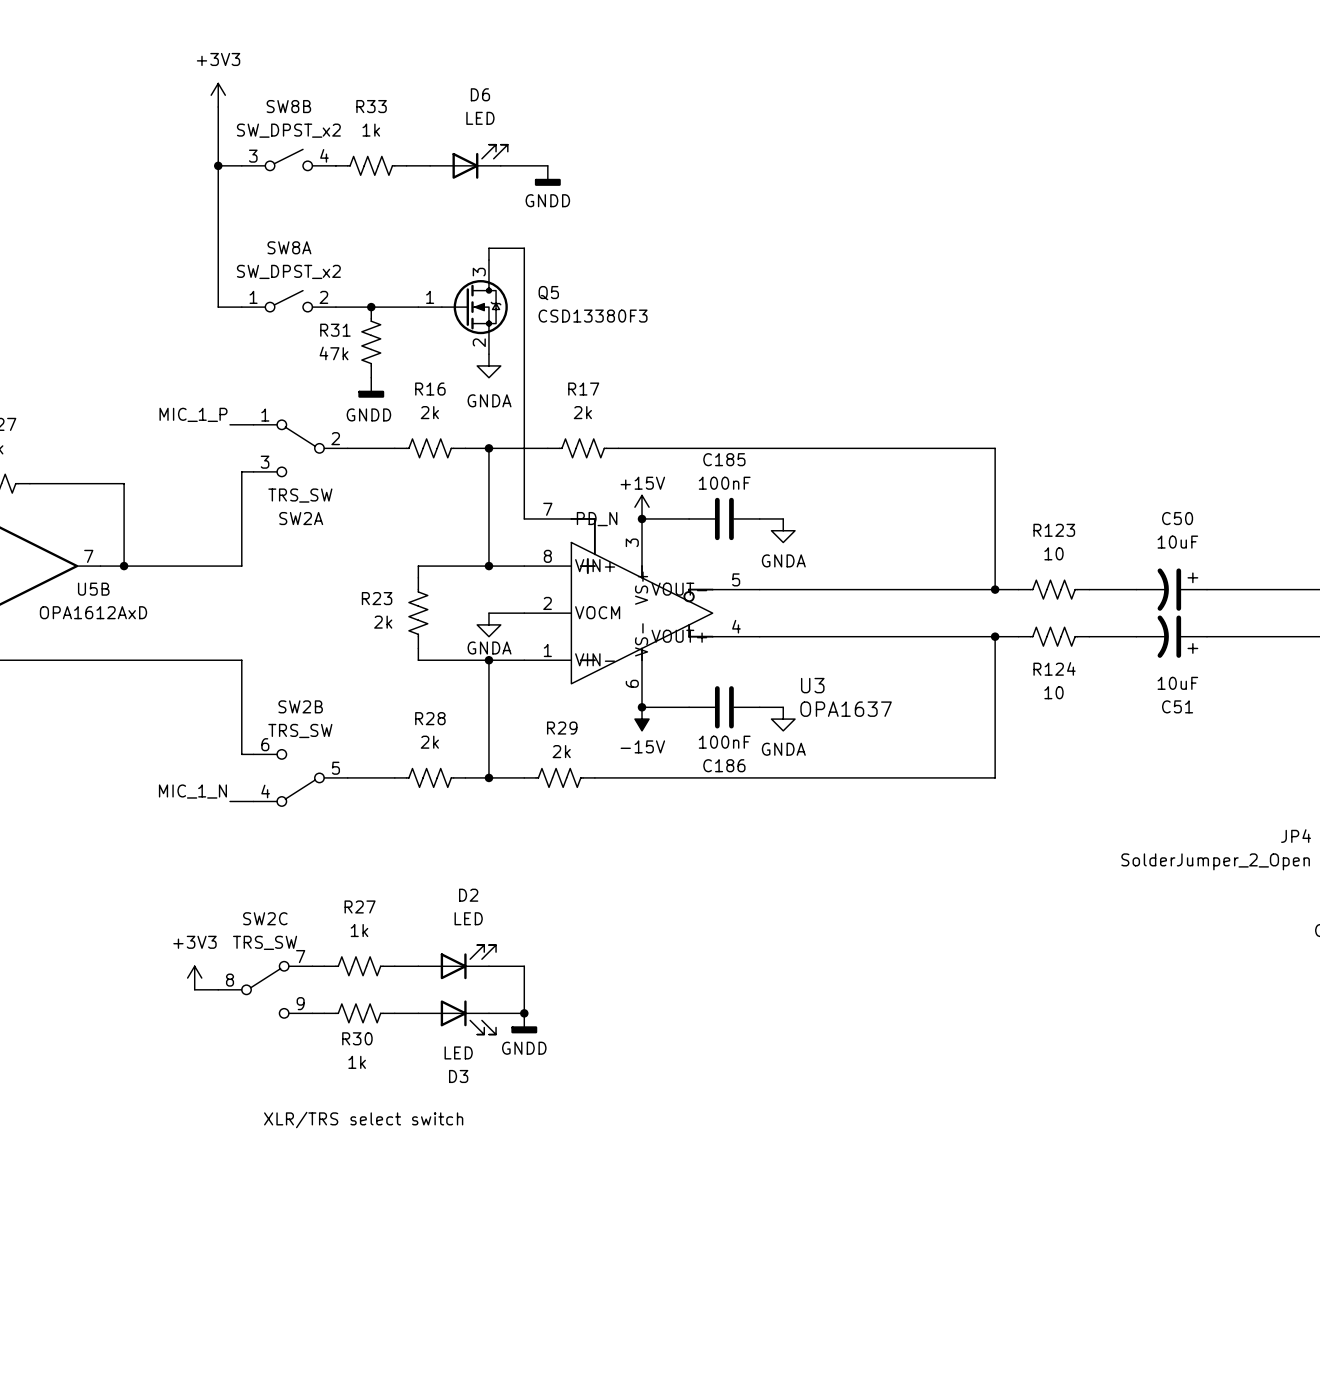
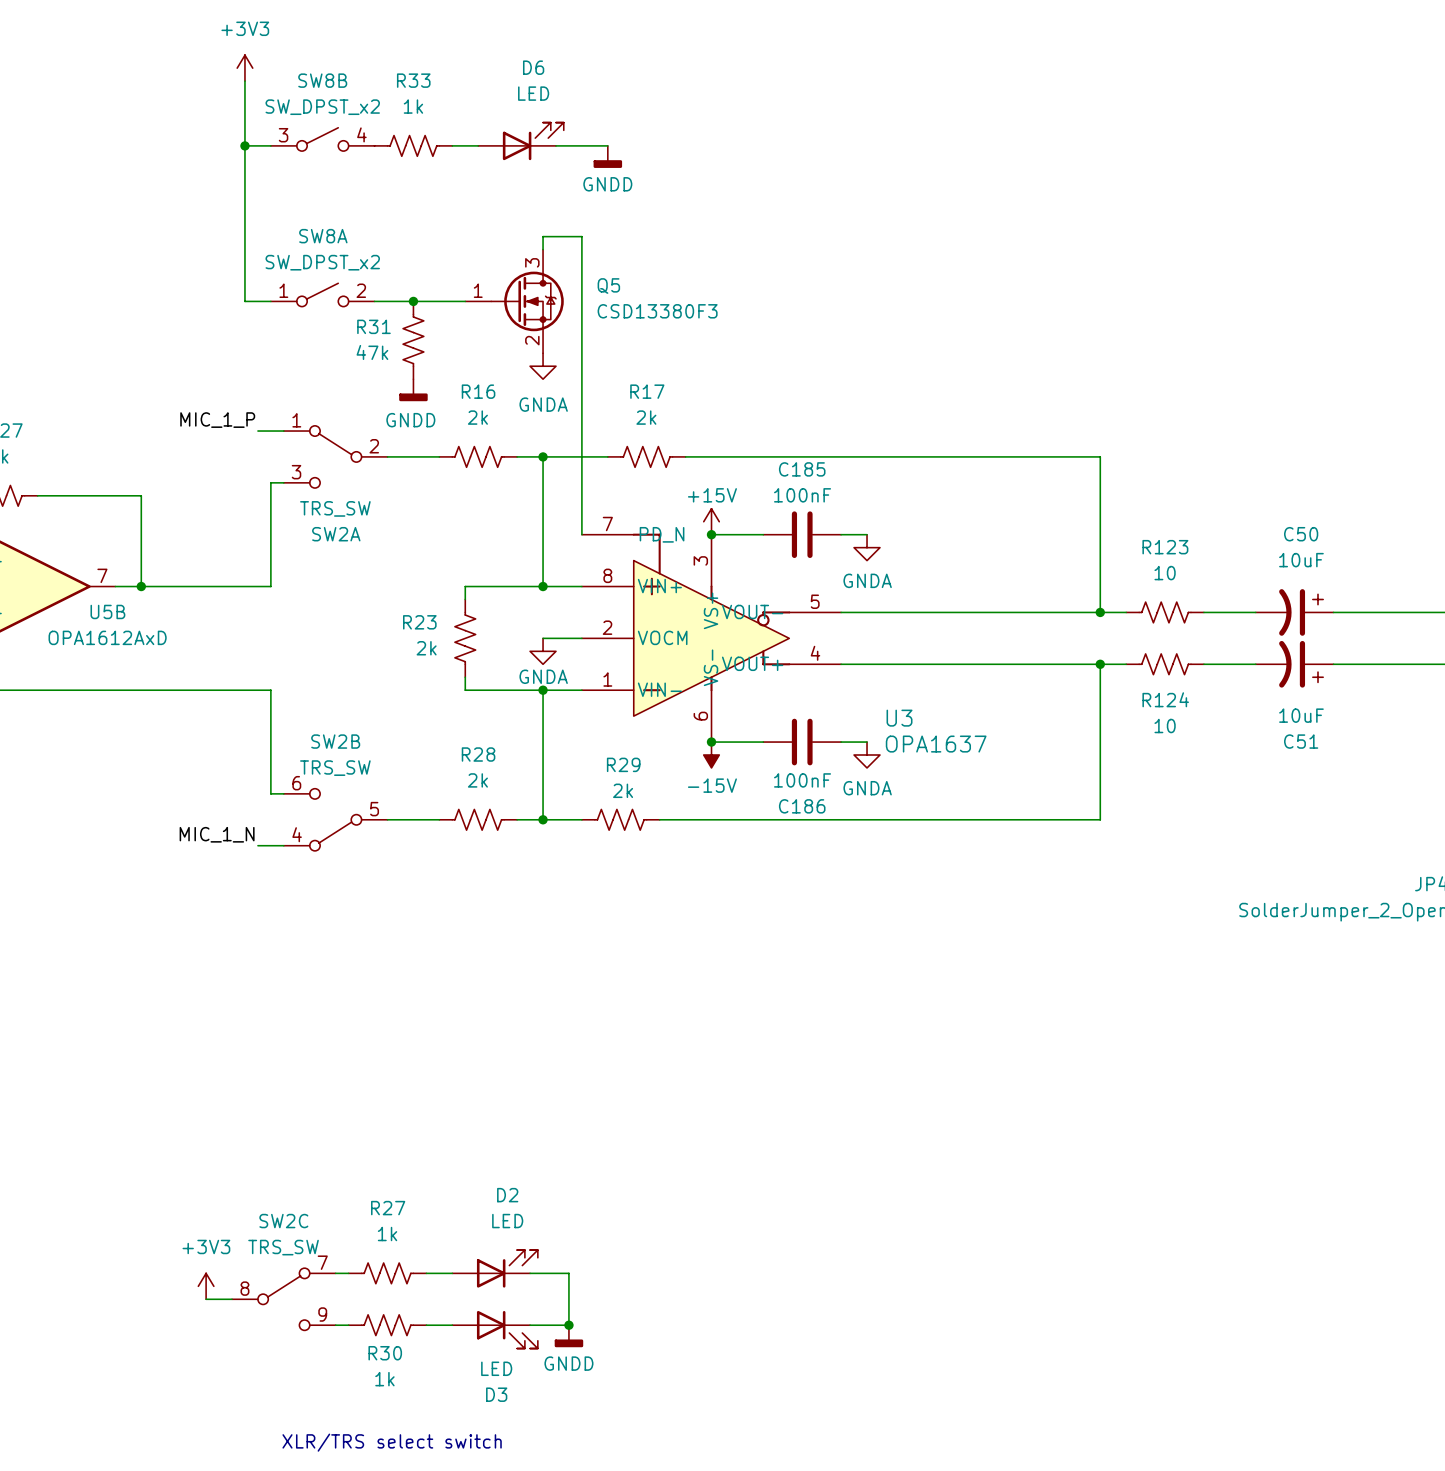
D2 position: (457, 962) -> (495, 1268)
wire: (312, 966) (324, 966) -> (335, 1273) (348, 1273)
R27 position: (359, 966) -> (387, 1273)
wire: (394, 966) (418, 966) -> (426, 1273) (452, 1273)
wire: (488, 966) (524, 966) (524, 1013) (488, 1013) -> (530, 1273) (568, 1273) (568, 1325) (530, 1325)
power symbol position: +3V3 (194, 978) -> +3V3 (206, 1286)
wire: (194, 989) (218, 989) -> (206, 1299) (232, 1299)
SW2C position: (265, 989) -> (283, 1299)
wire: (312, 1013) (324, 1013) -> (335, 1325) (348, 1325)
R30 position: (359, 1013) -> (387, 1325)
wire: (394, 1013) (418, 1013) -> (426, 1325) (452, 1325)
junction: (524, 1013) -> none
D3 position: (457, 1017) -> (495, 1329)
power symbol position: GNDD (524, 1023) -> GNDD (568, 1336)
text position: XLR/TRS select switch (363, 1120) -> XLR/TRS select switch (392, 1442)
junction: none -> (568, 1325)

